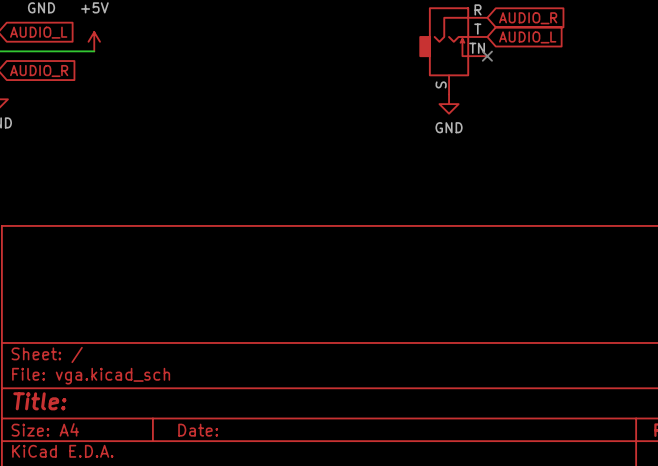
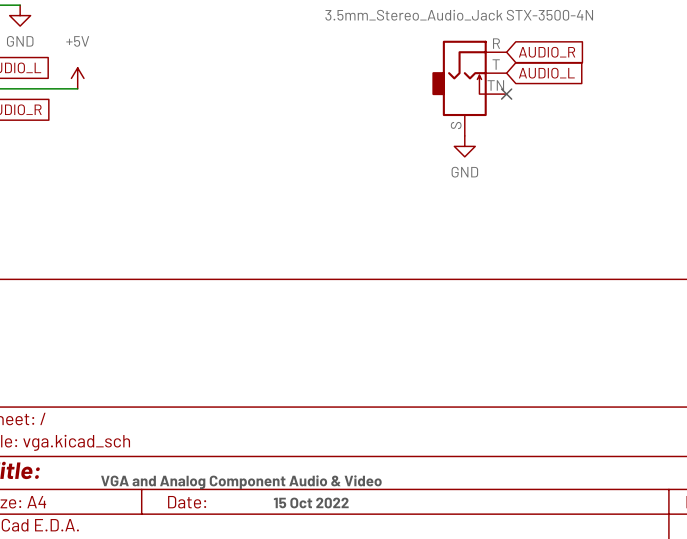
text: none -> VGA and Analog Component Audio & Video (241, 482)
text: none -> 15 Oct 2022 (311, 502)

